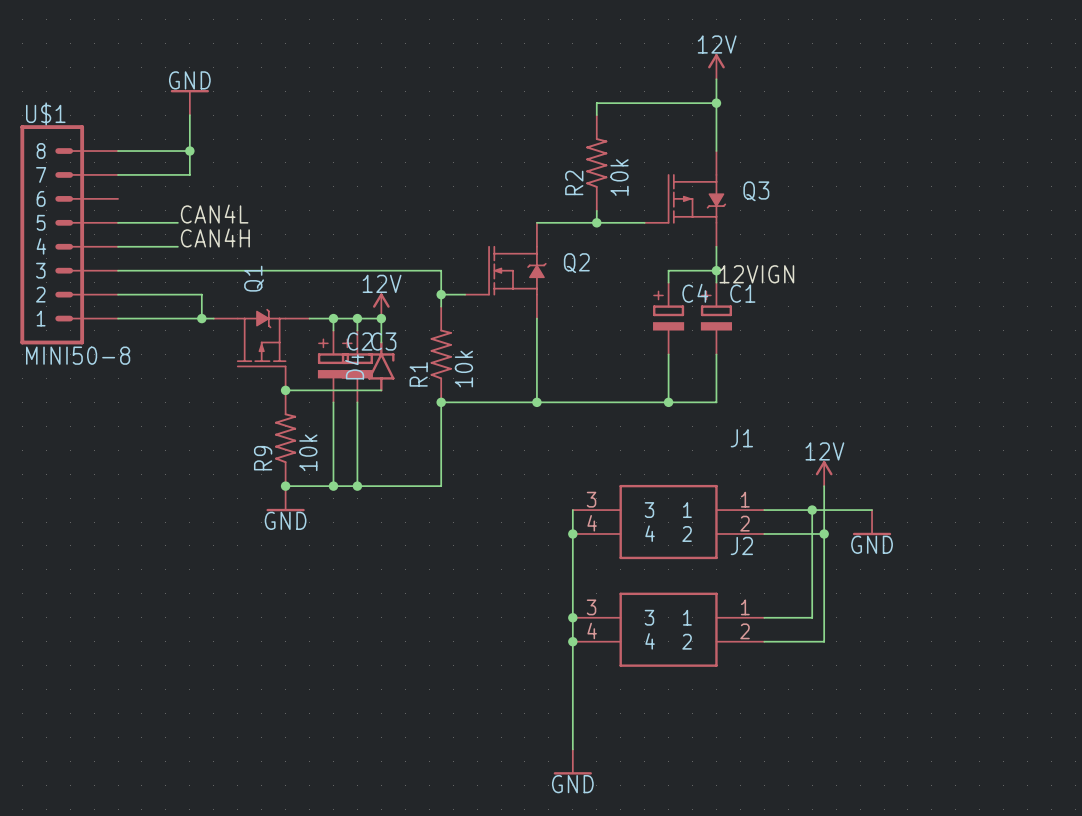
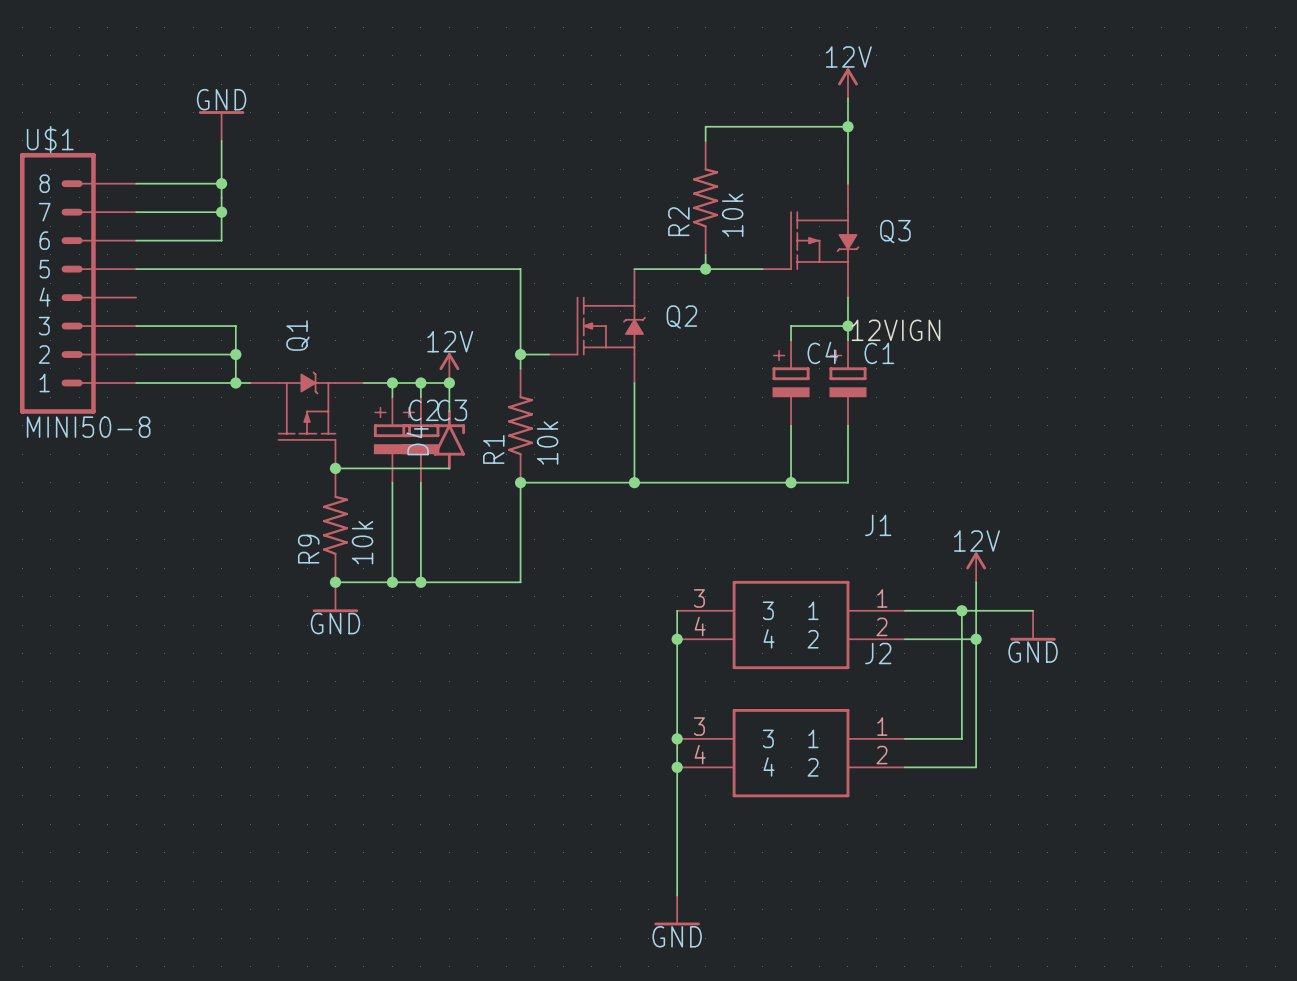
wire: none -> (221, 212) (221, 240) (136, 240)
junction: none -> (221, 212)
label: CAN4L (214, 214) -> none
label: CAN4H (215, 237) -> none
wire: (118, 246) (177, 246) -> none
wire: (201, 270) (441, 270) -> (207, 269) (520, 269) (520, 326)
wire: none -> (235, 326) (235, 354)
junction: none -> (235, 354)

